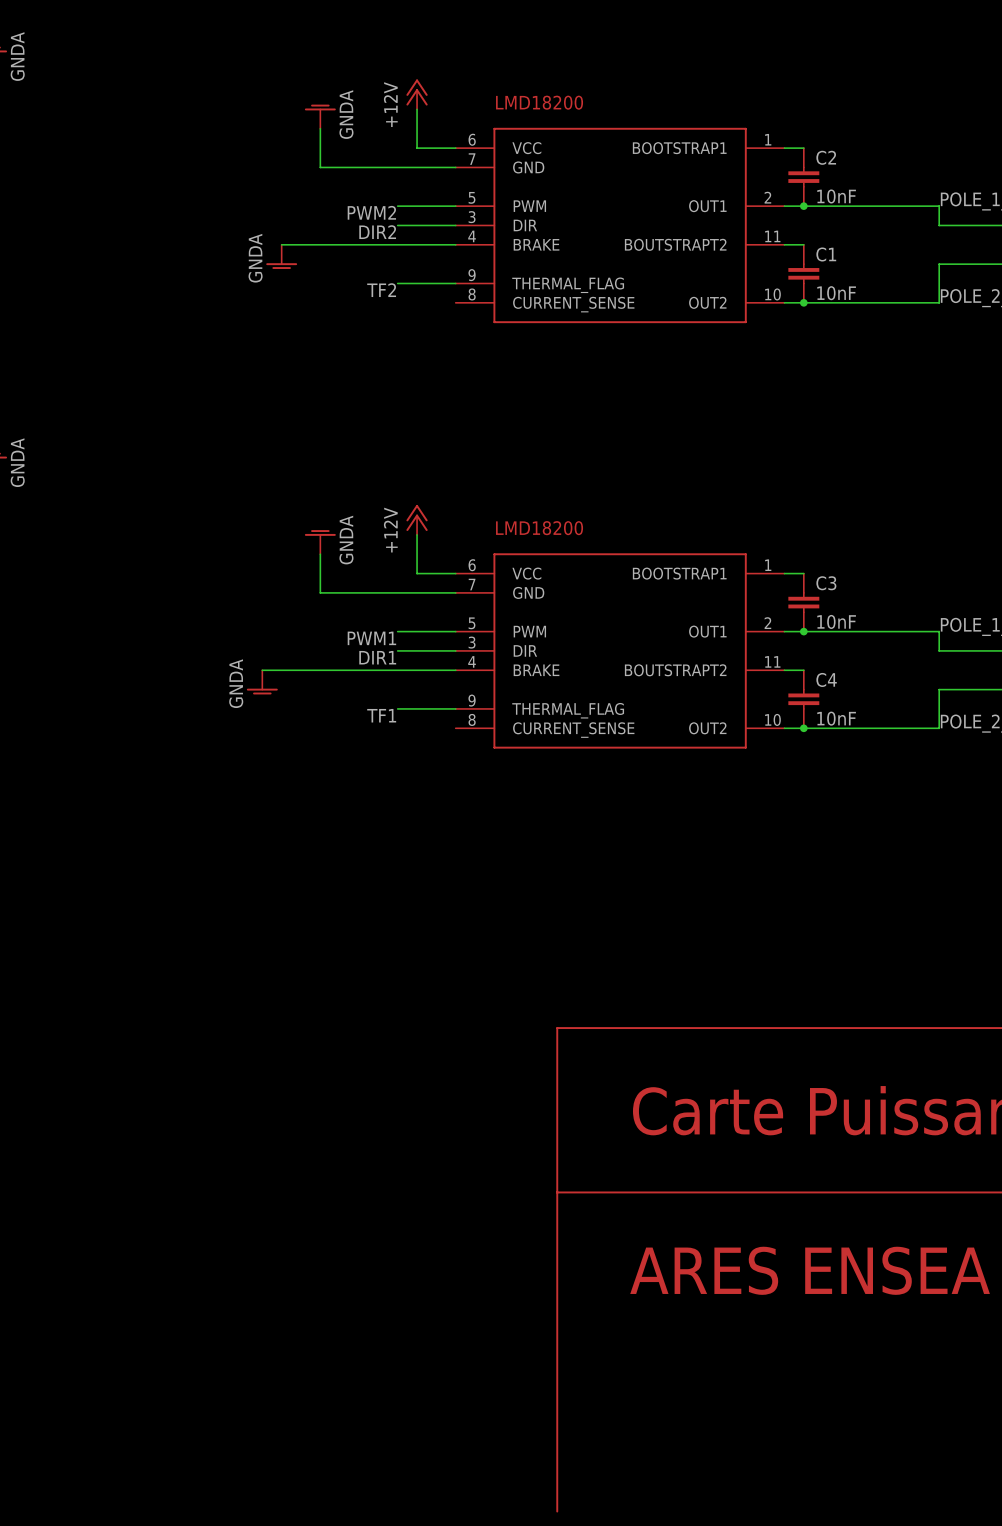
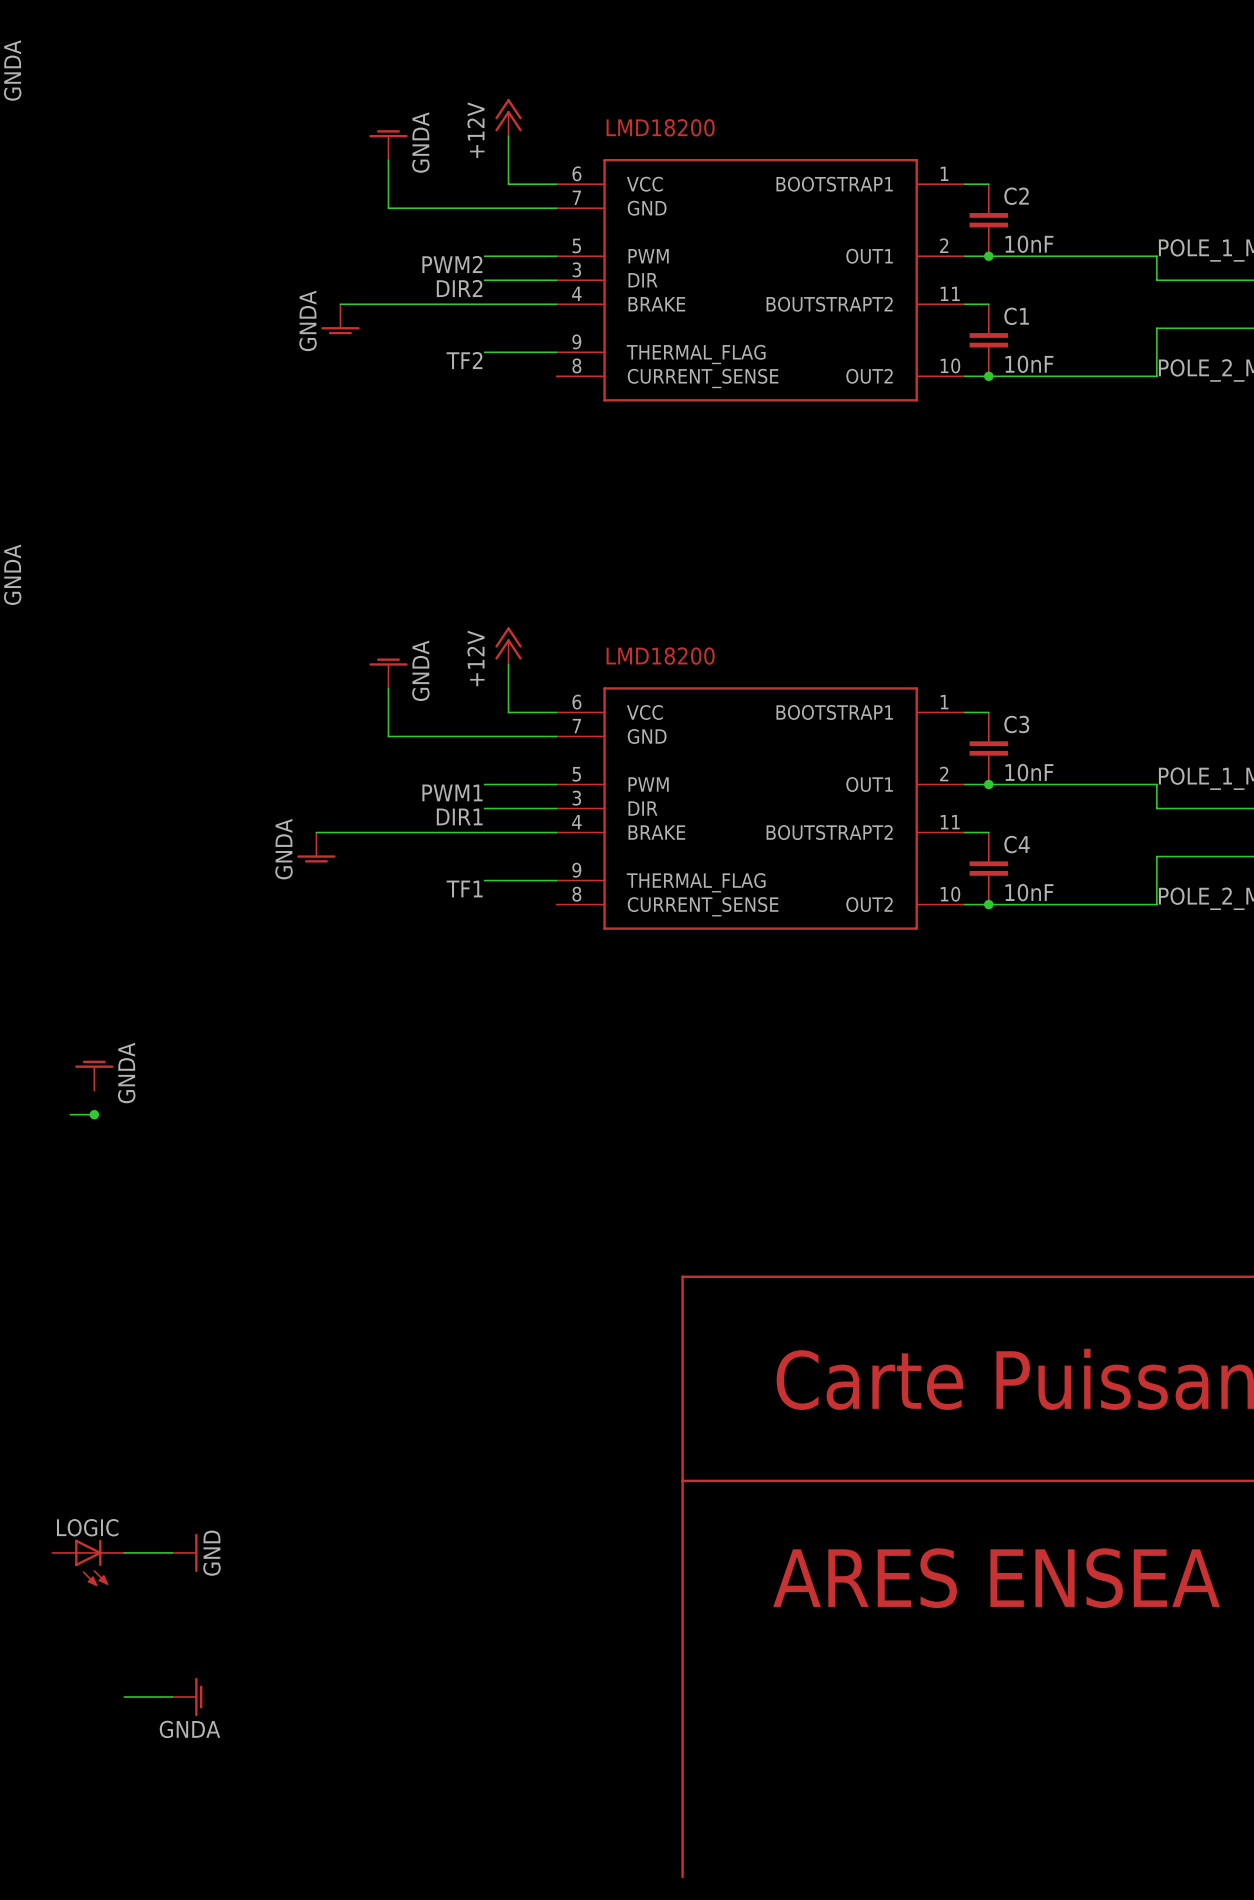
power symbol: none -> GNDA (94, 1075)
wire: none -> (70, 1114) (94, 1114)
junction: none -> (94, 1114)
wire: none -> (124, 1552) (172, 1552)
power symbol: none -> GND (184, 1552)
LOGIC: none -> (88, 1562)
wire: none -> (124, 1696) (172, 1696)
power symbol: none -> GNDA (187, 1696)

